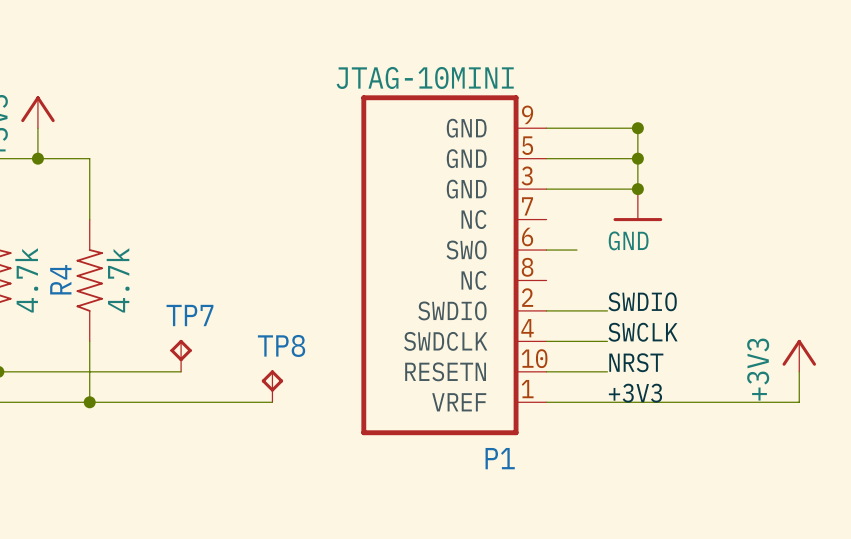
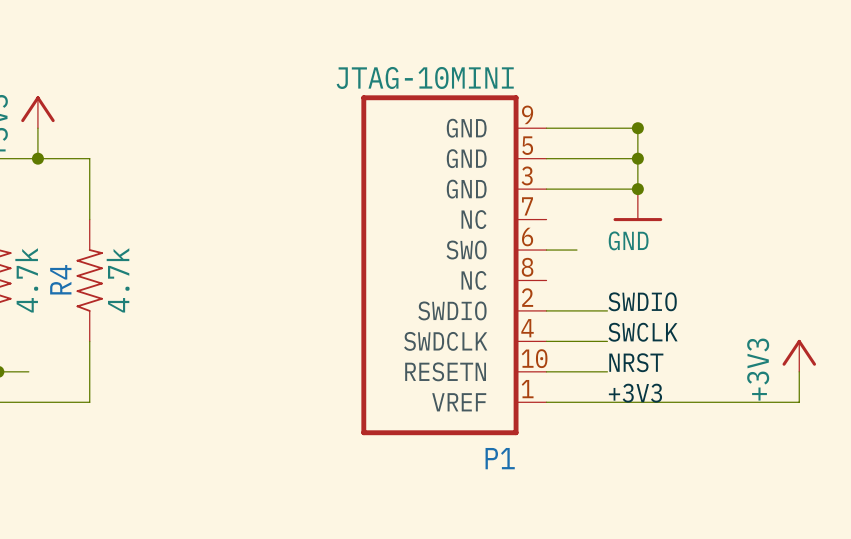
TP7: (181, 355) -> none
wire: (28, 371) (181, 371) -> none
TP8: (272, 386) -> none
wire: (89, 402) (272, 402) -> none
junction: (89, 402) -> none

